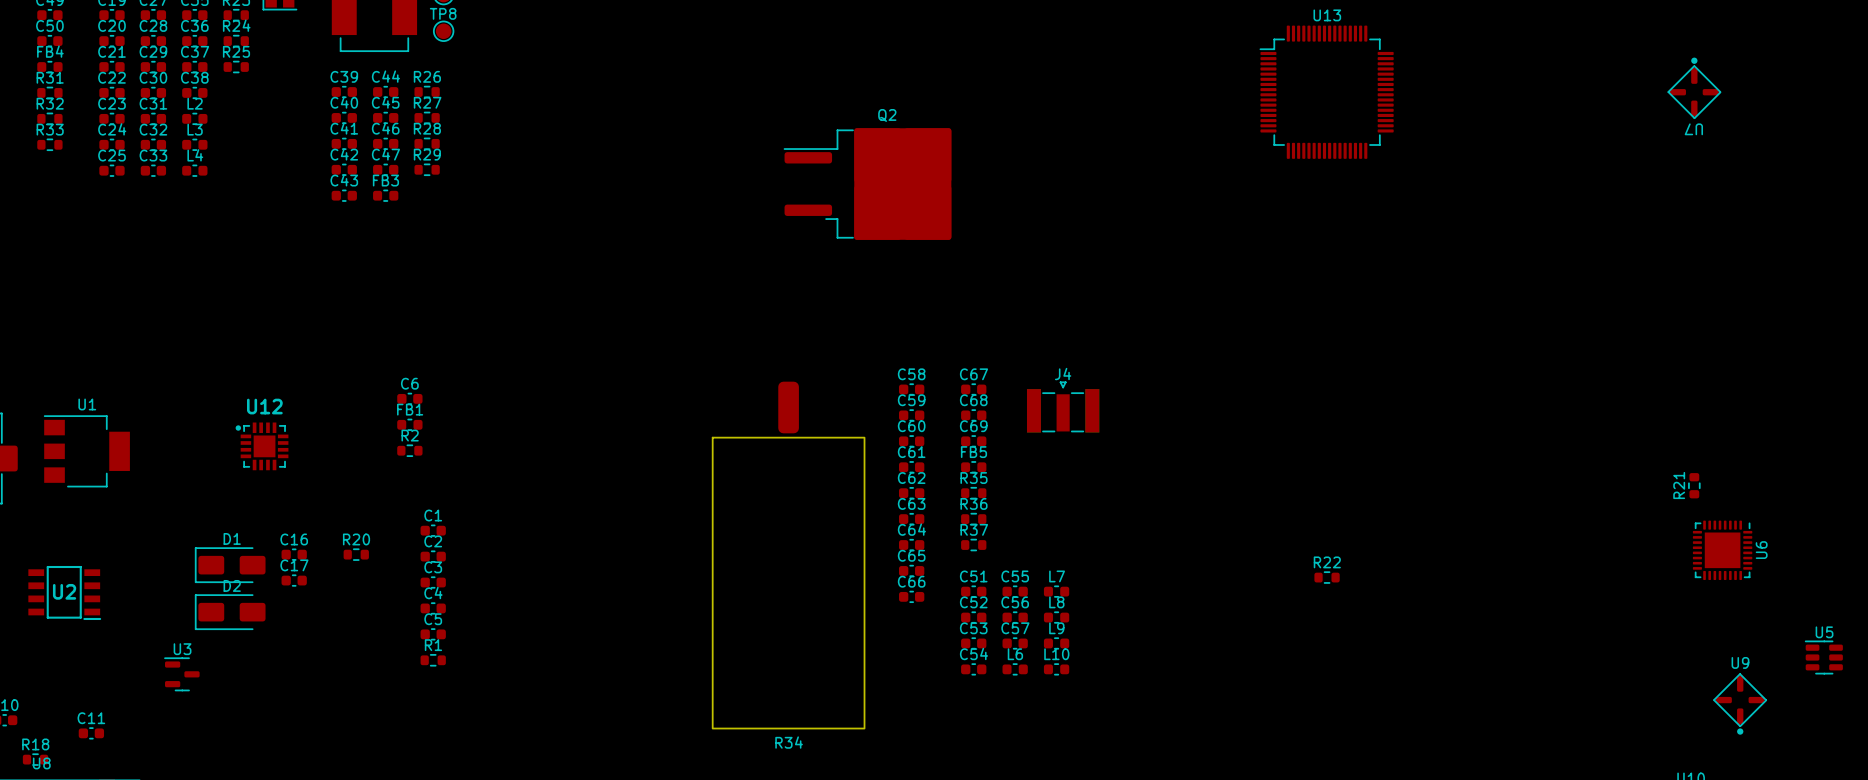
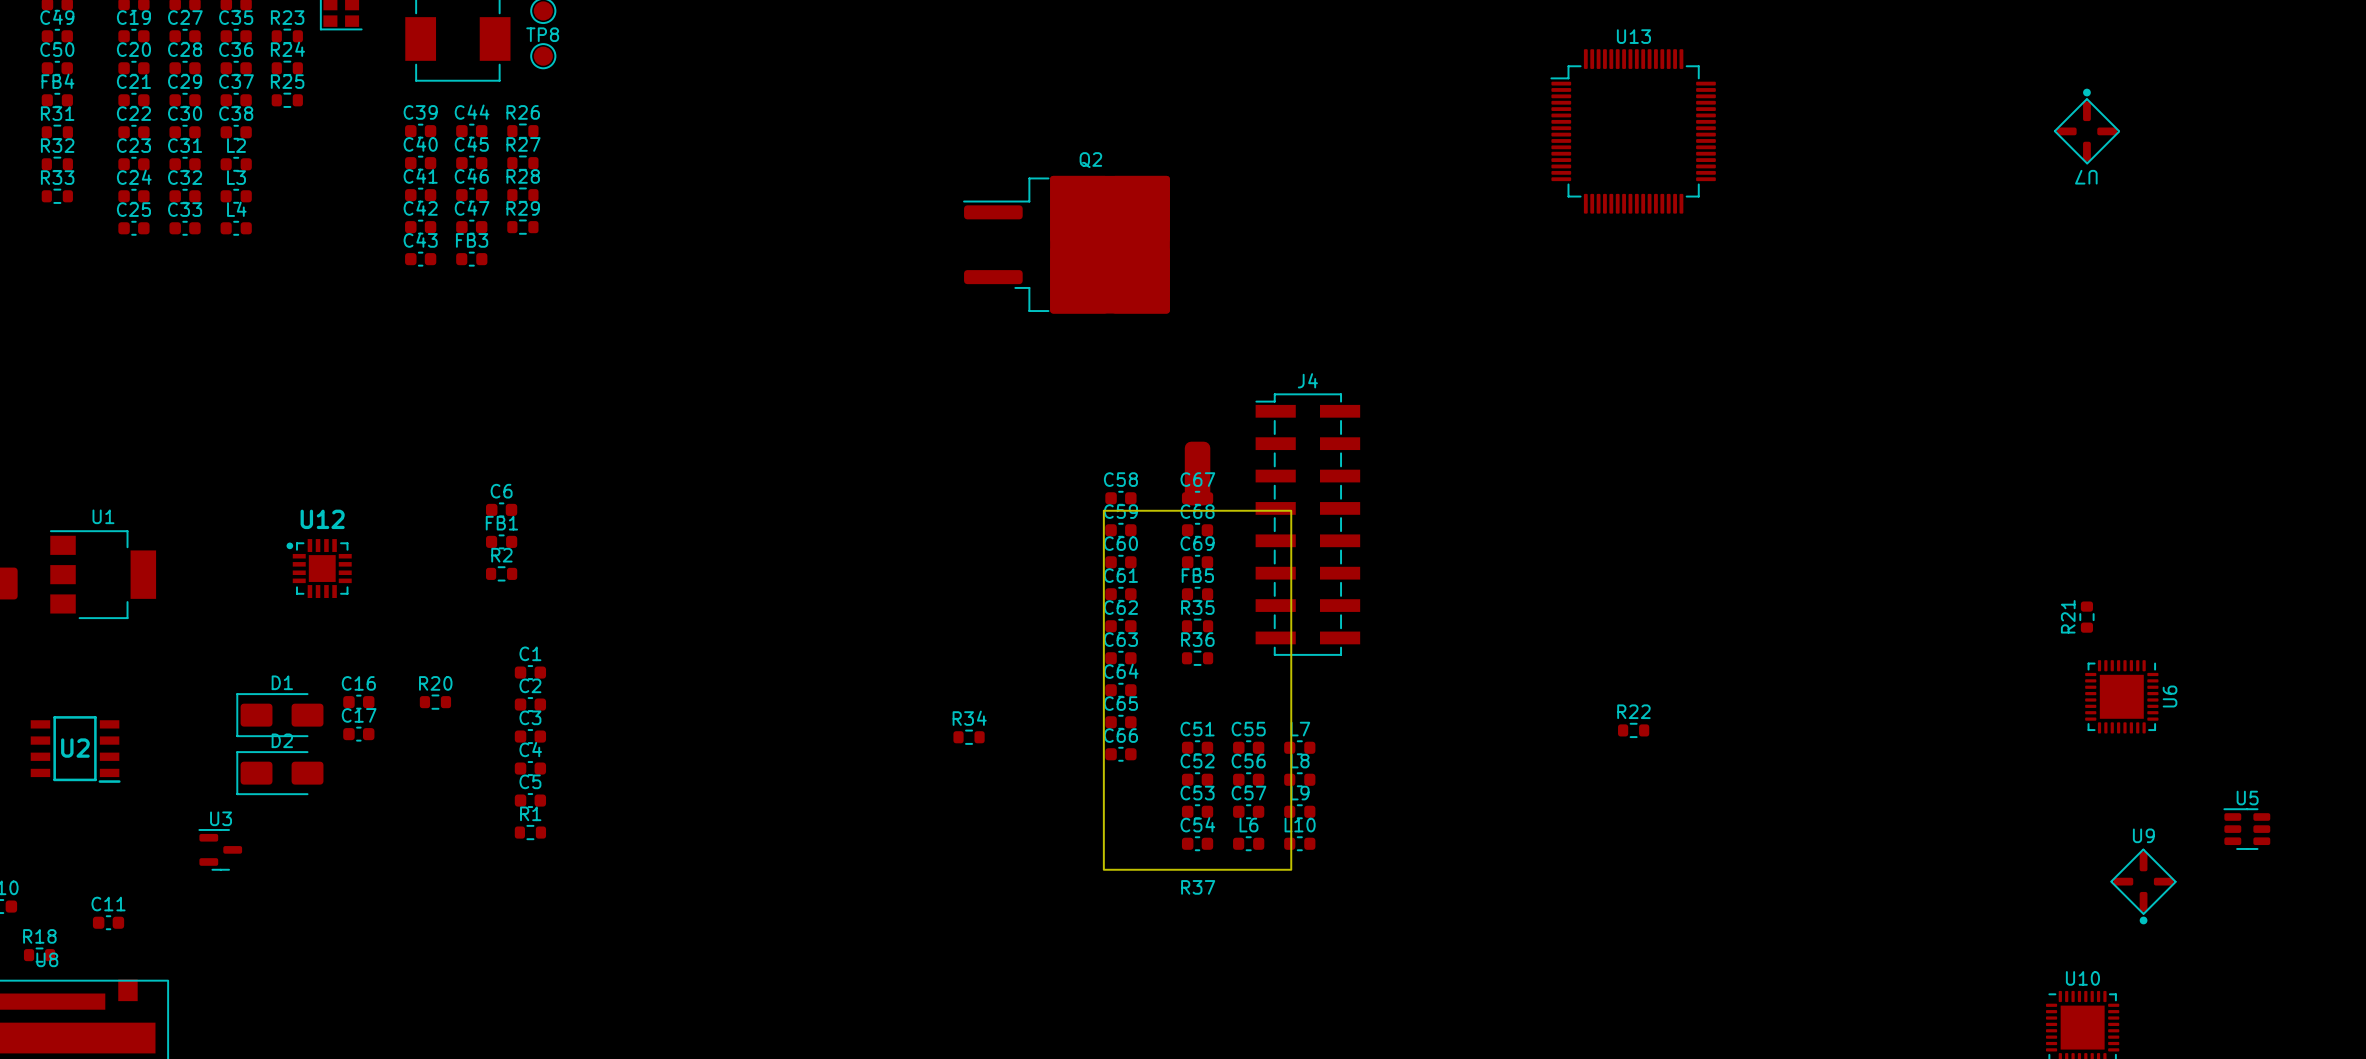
J4 name position: J4 (1063, 374) -> J4 (1307, 380)
R34 footprint: [712, 381, 866, 730] -> [953, 729, 985, 745]
J4 footprint: [1026, 381, 1100, 433] -> [1255, 393, 1361, 656]
R37 name position: R37 (974, 529) -> R37 (1198, 887)
R37 footprint: [961, 539, 987, 552] -> [1103, 441, 1293, 871]
R34 name position: R34 (789, 742) -> R34 (969, 718)

